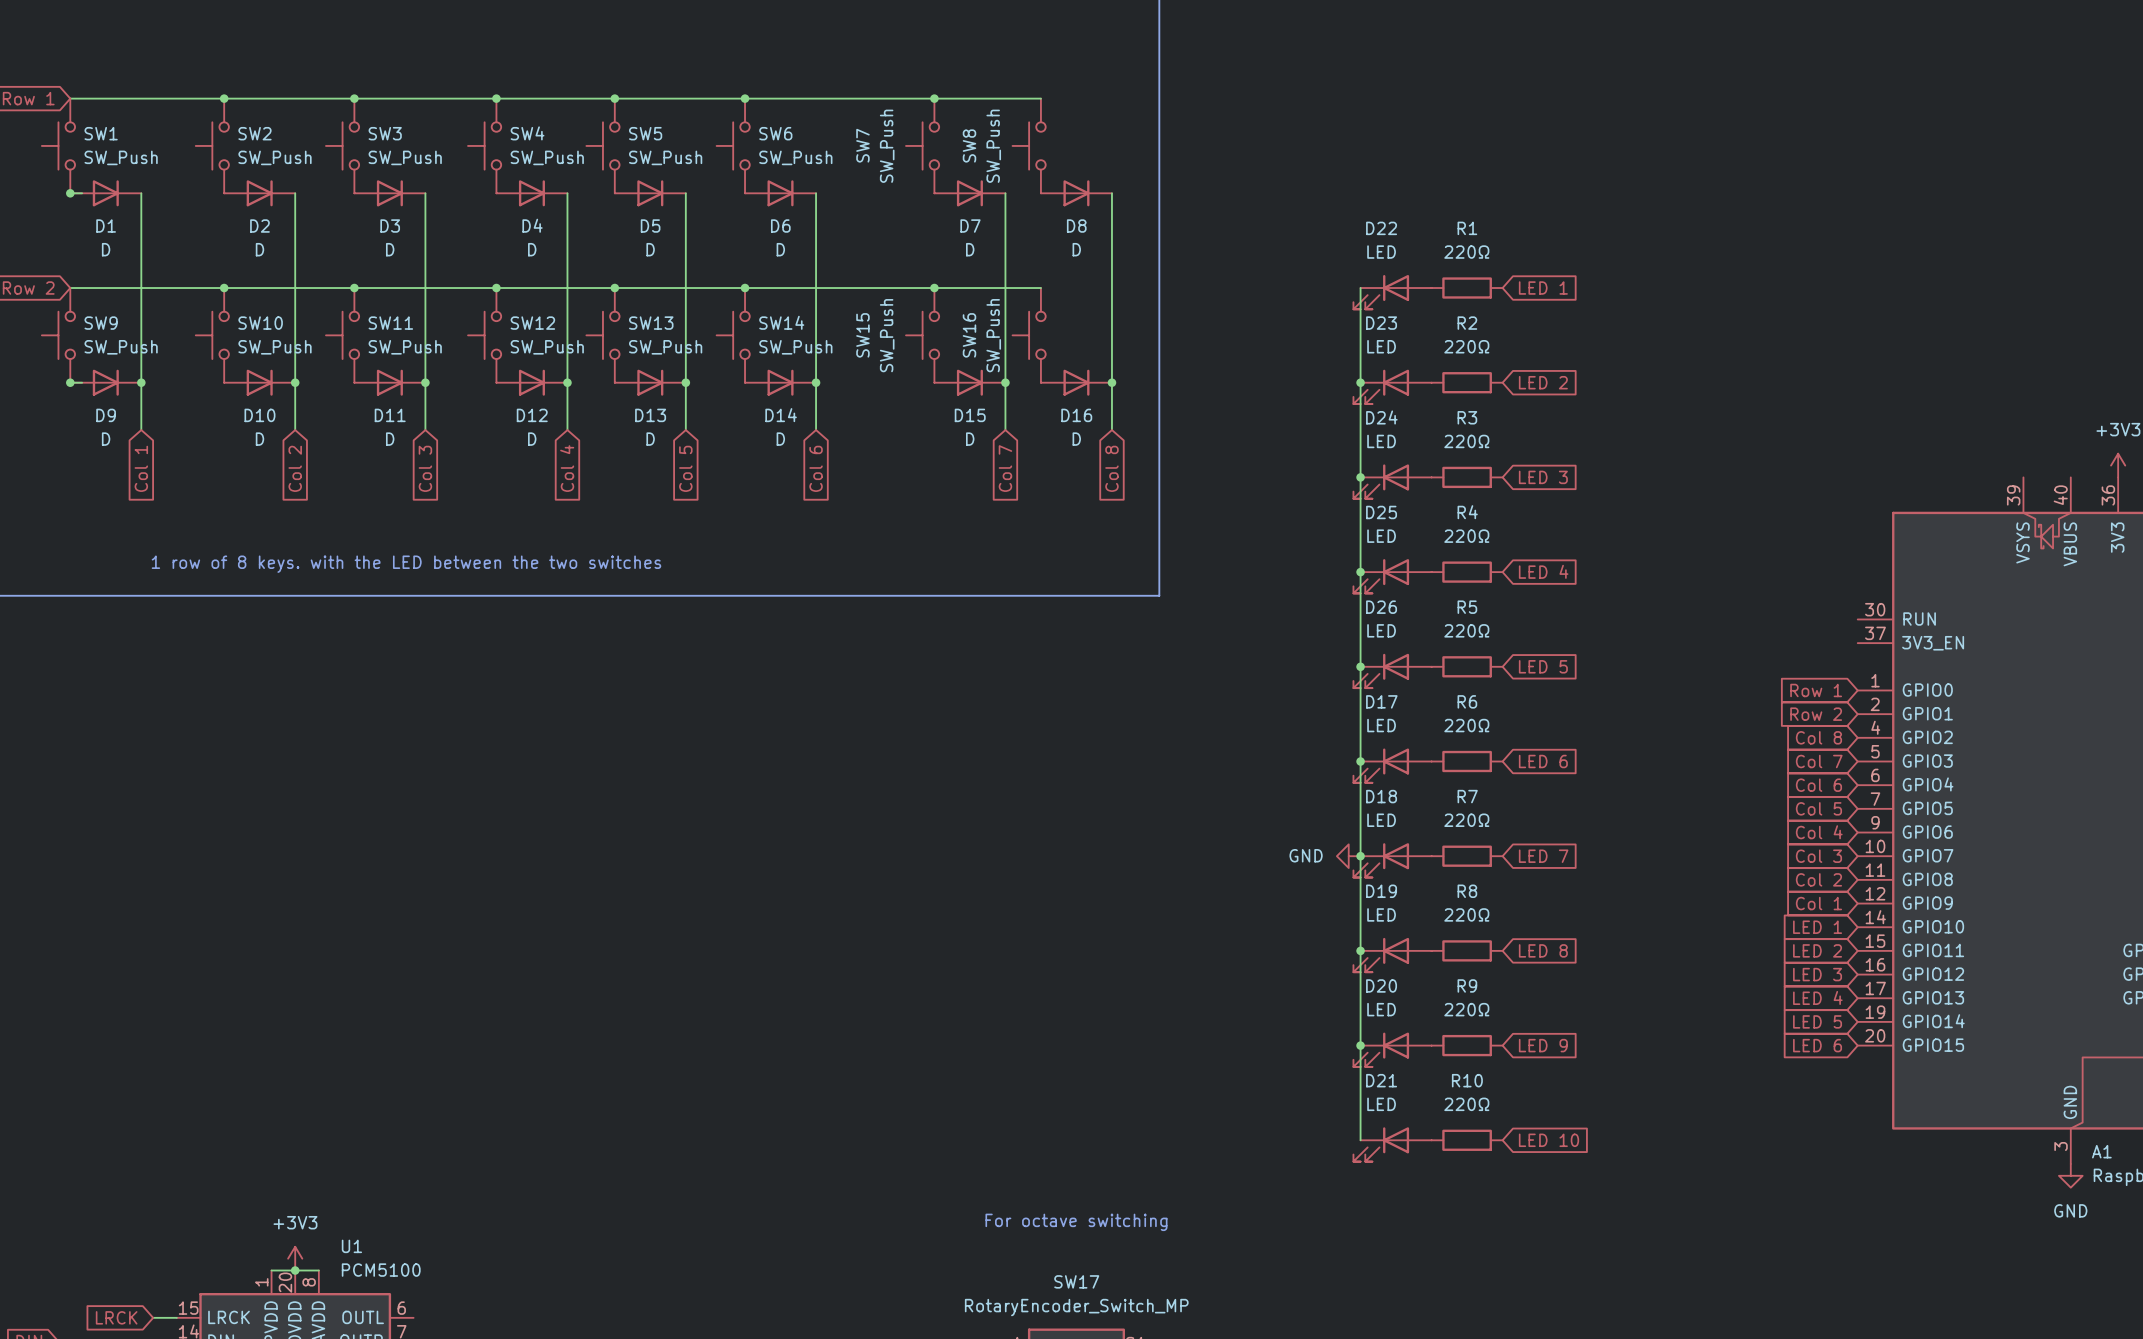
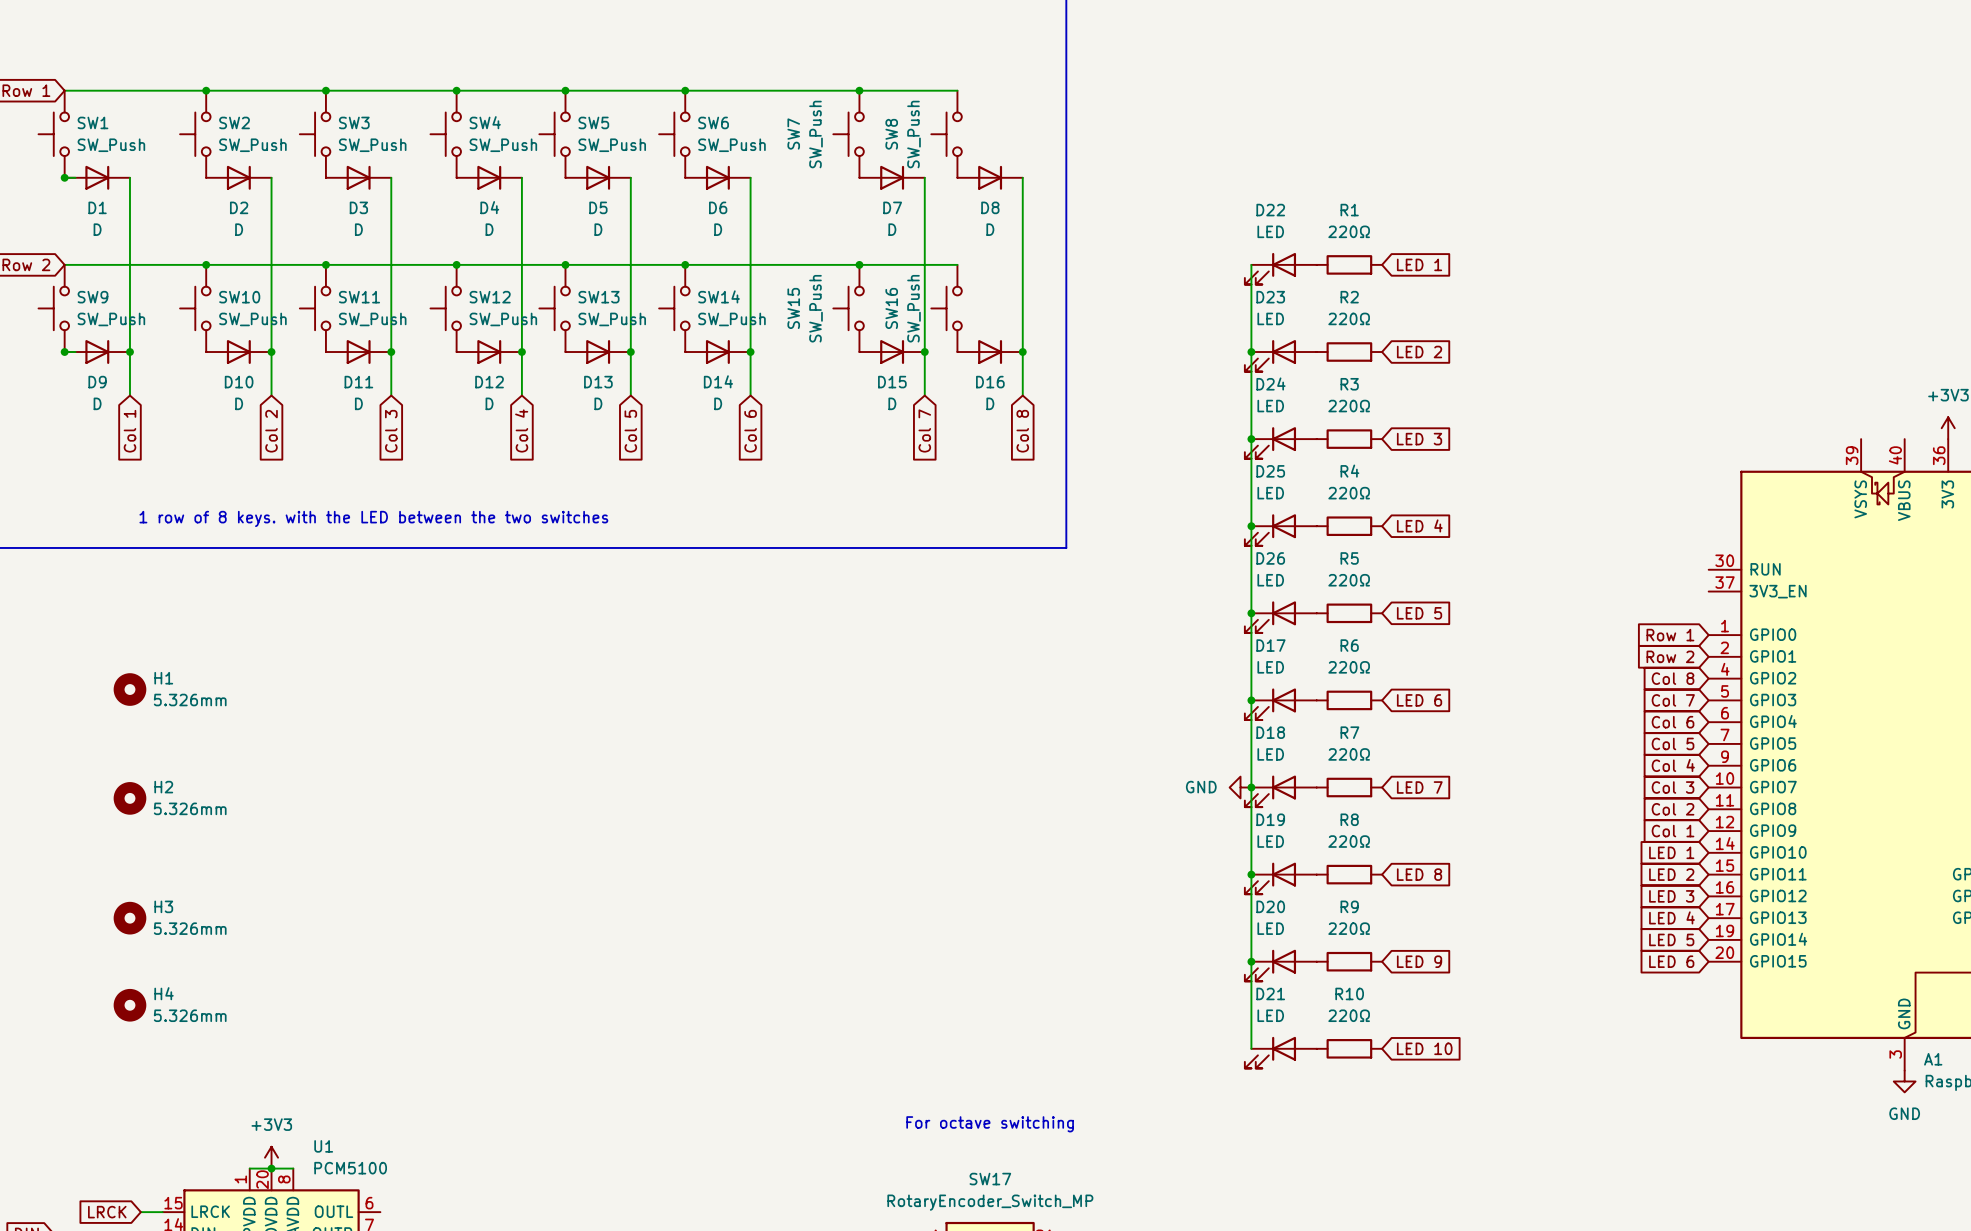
H1: none -> 5.326mm (129, 689)
H2: none -> 5.326mm (129, 798)
H3: none -> 5.326mm (129, 918)
H4: none -> 5.326mm (129, 1005)

